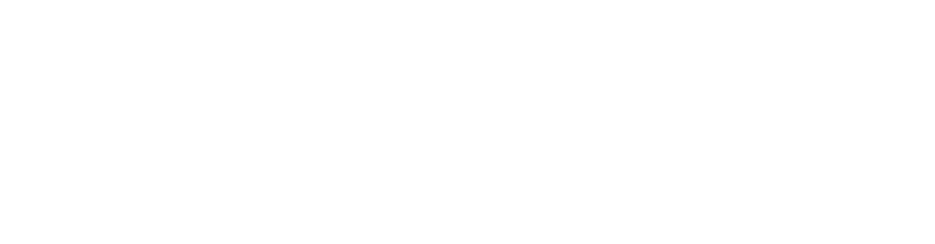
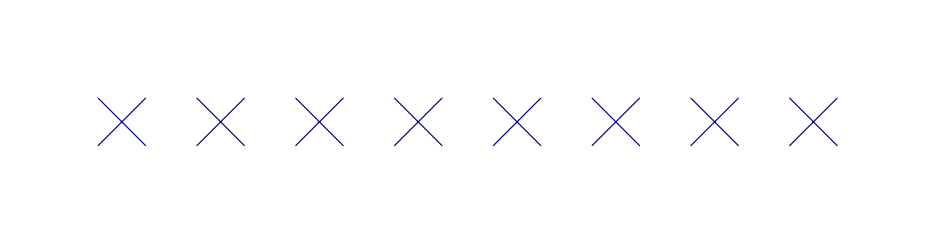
no-connect mark: none -> (121, 121)
no-connect mark: none -> (220, 121)
no-connect mark: none -> (319, 121)
no-connect mark: none -> (418, 121)
no-connect mark: none -> (517, 121)
no-connect mark: none -> (615, 121)
no-connect mark: none -> (714, 121)
no-connect mark: none -> (813, 121)

